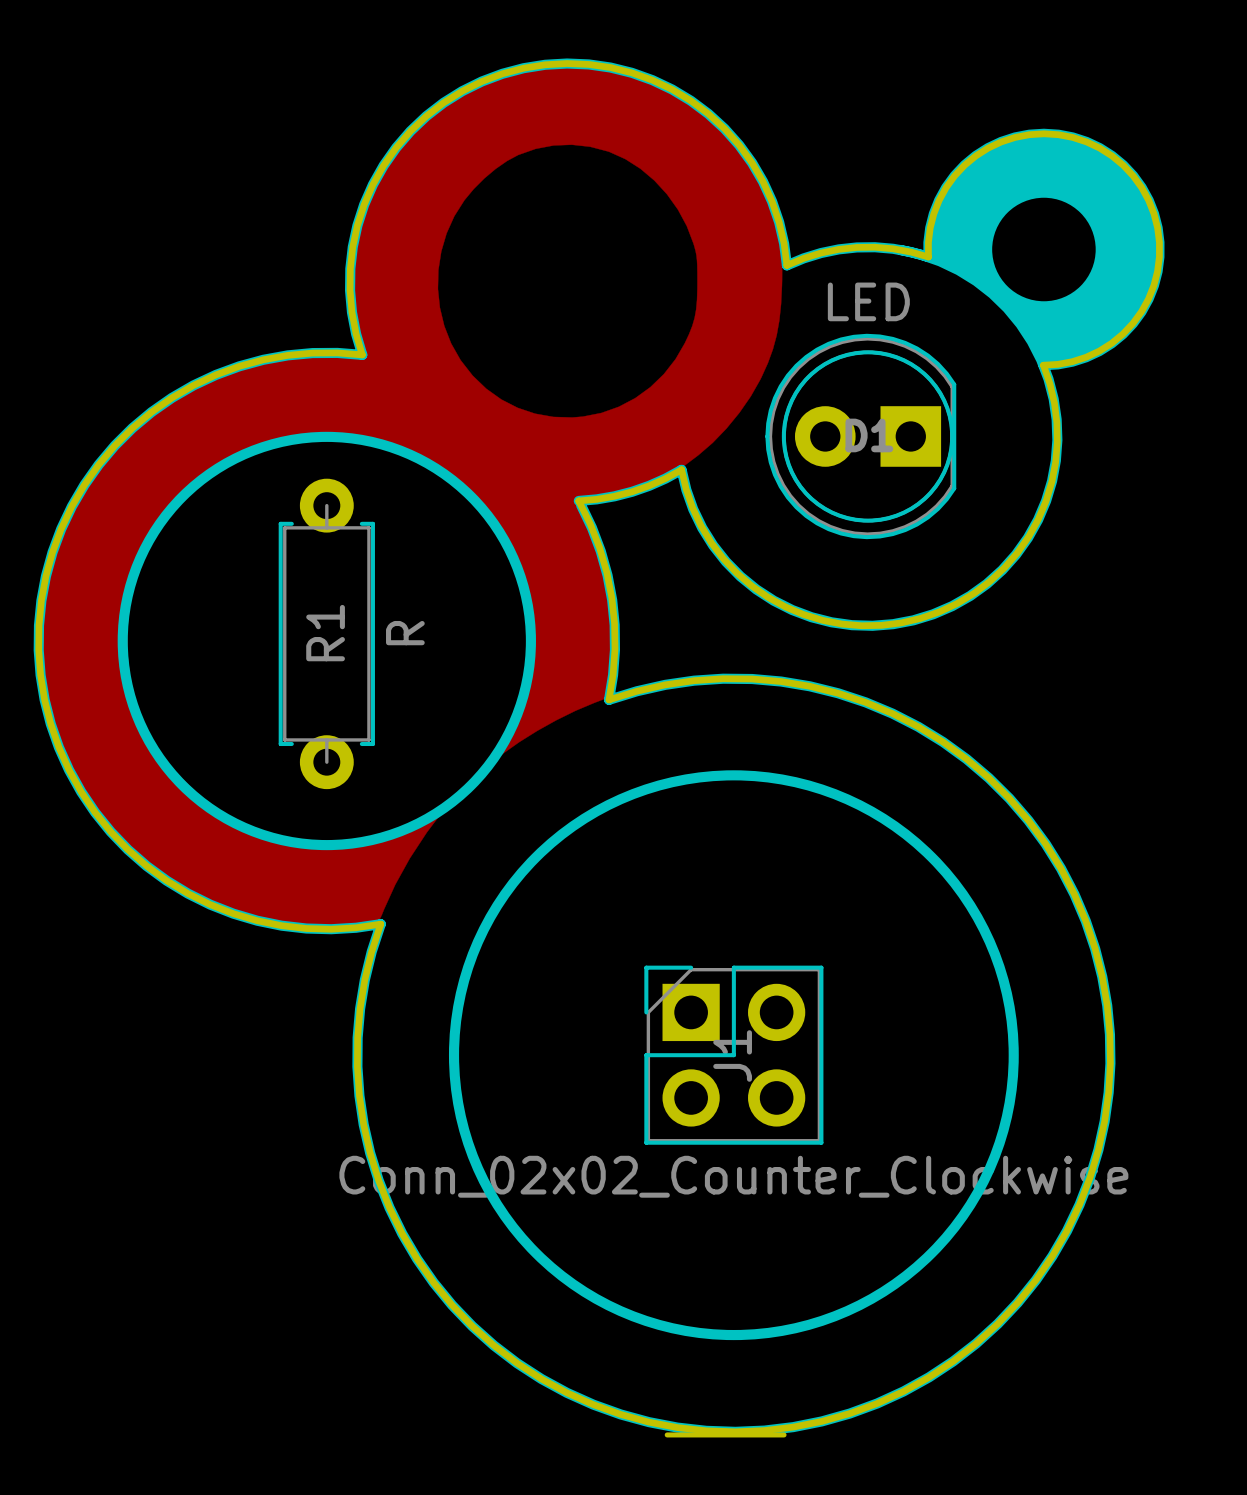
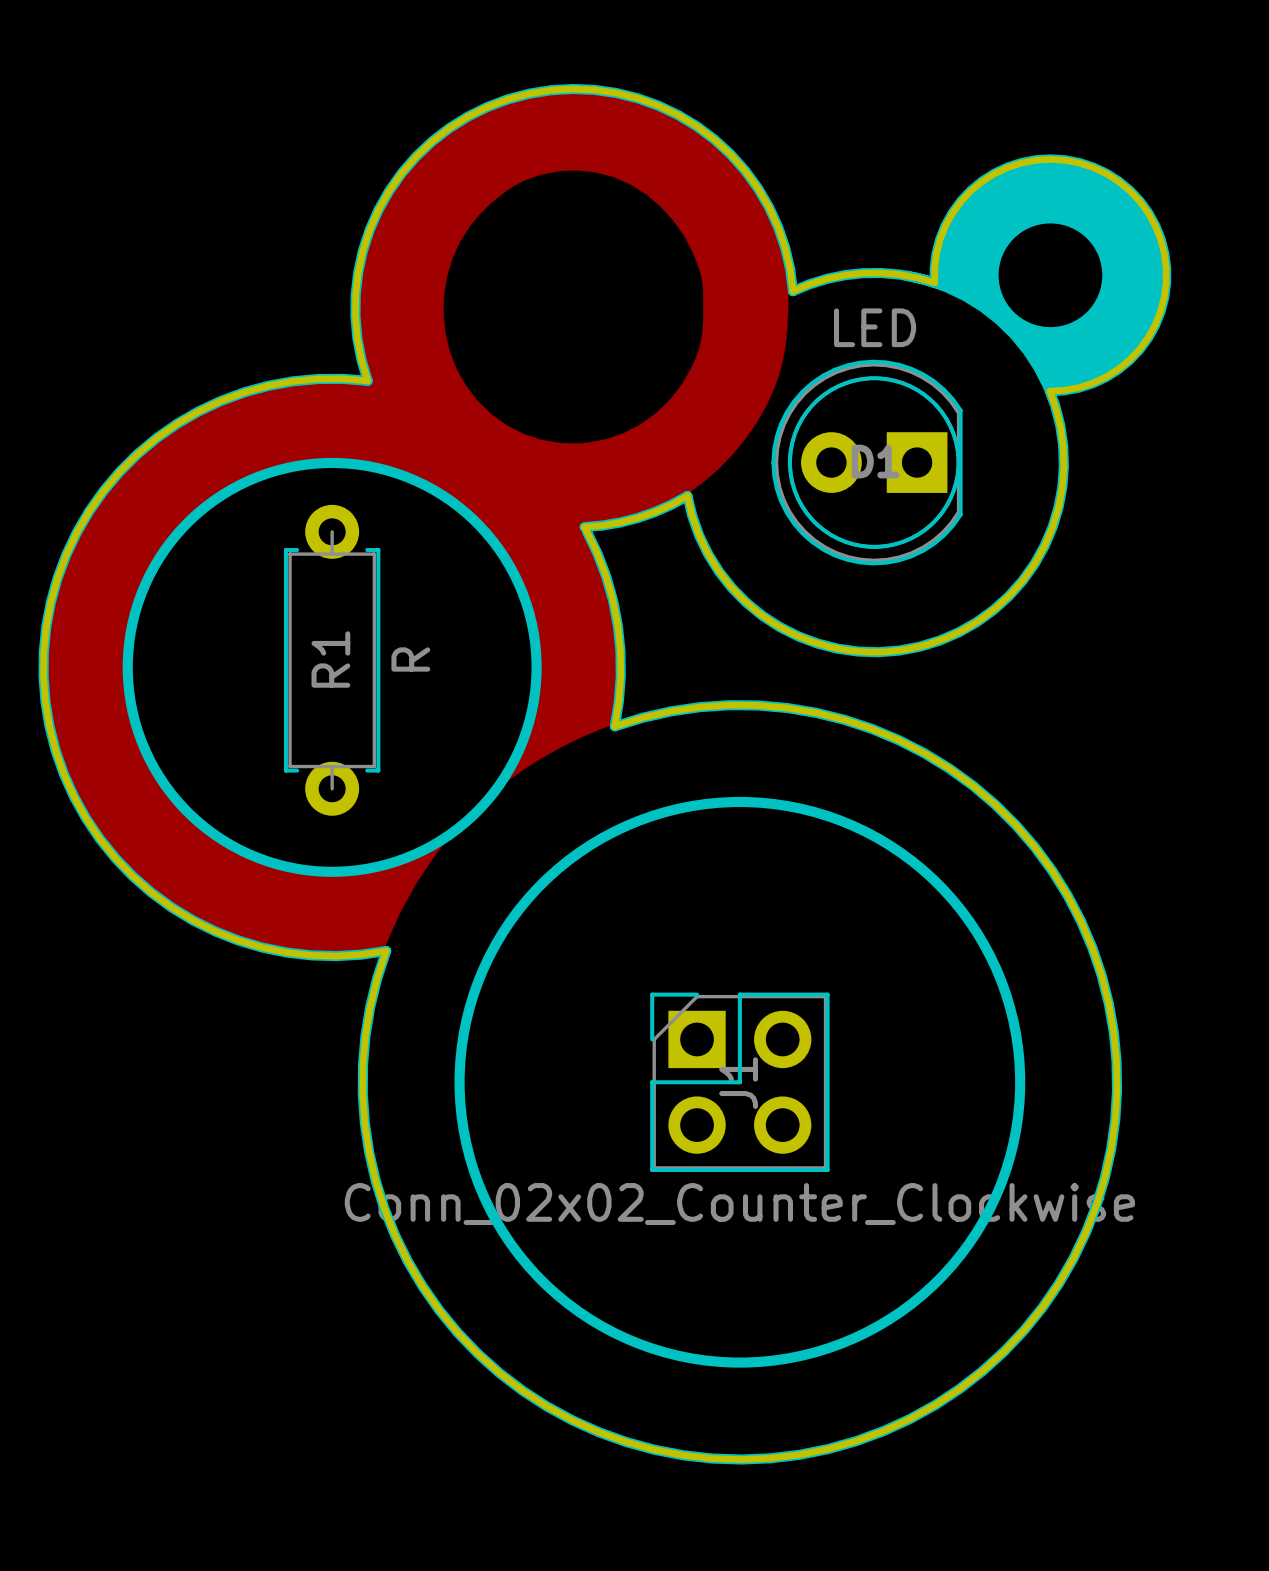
board edge: (667, 1434) (784, 1434) -> none

